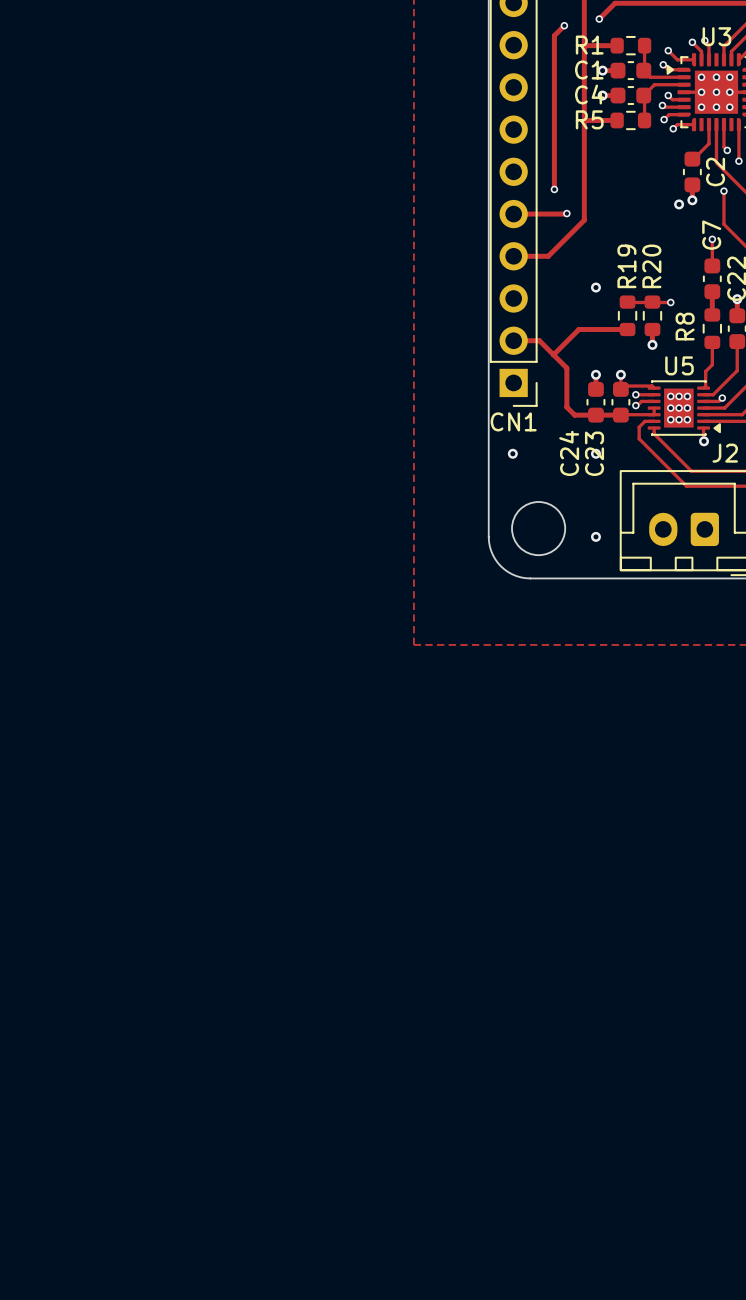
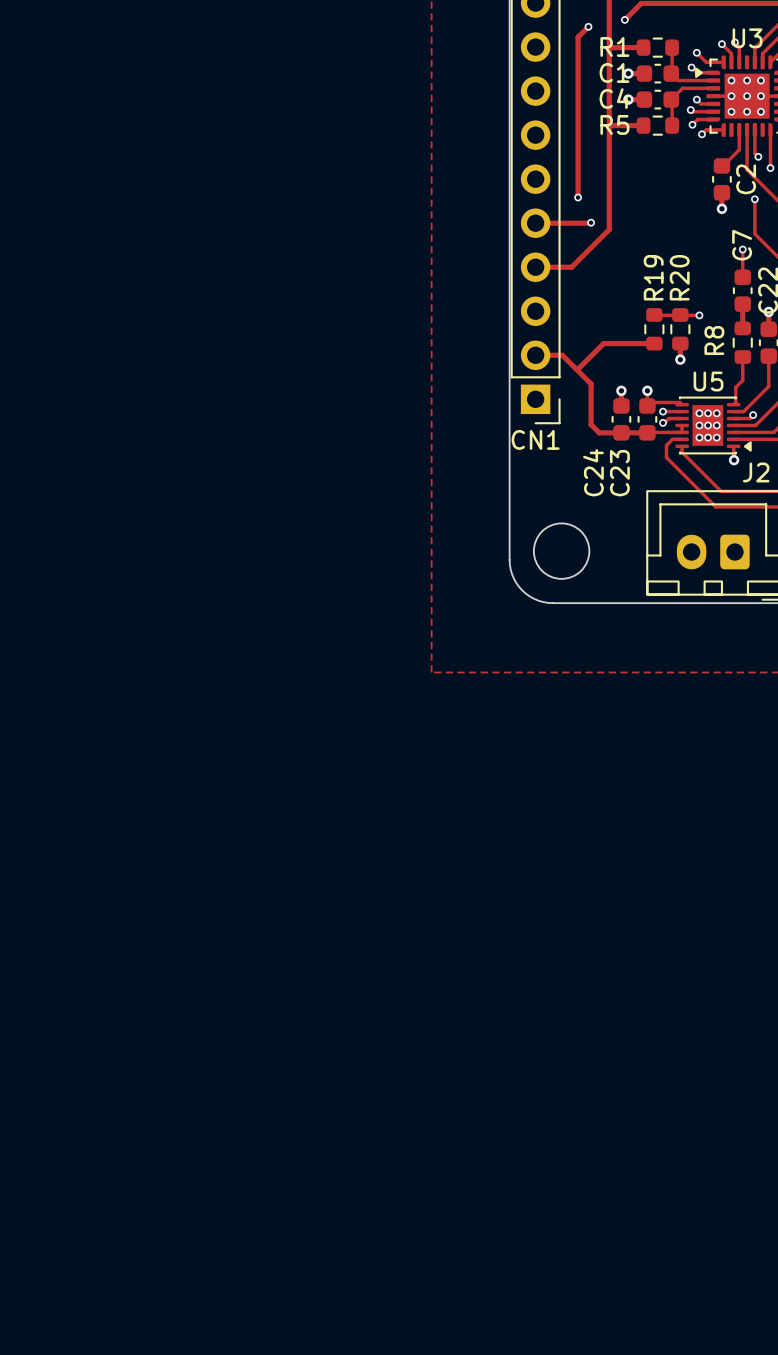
via: (679, 204) -> none
via: (595, 287) -> none
via: (512, 453) -> none
via: (595, 453) -> none
via: (595, 536) -> none

